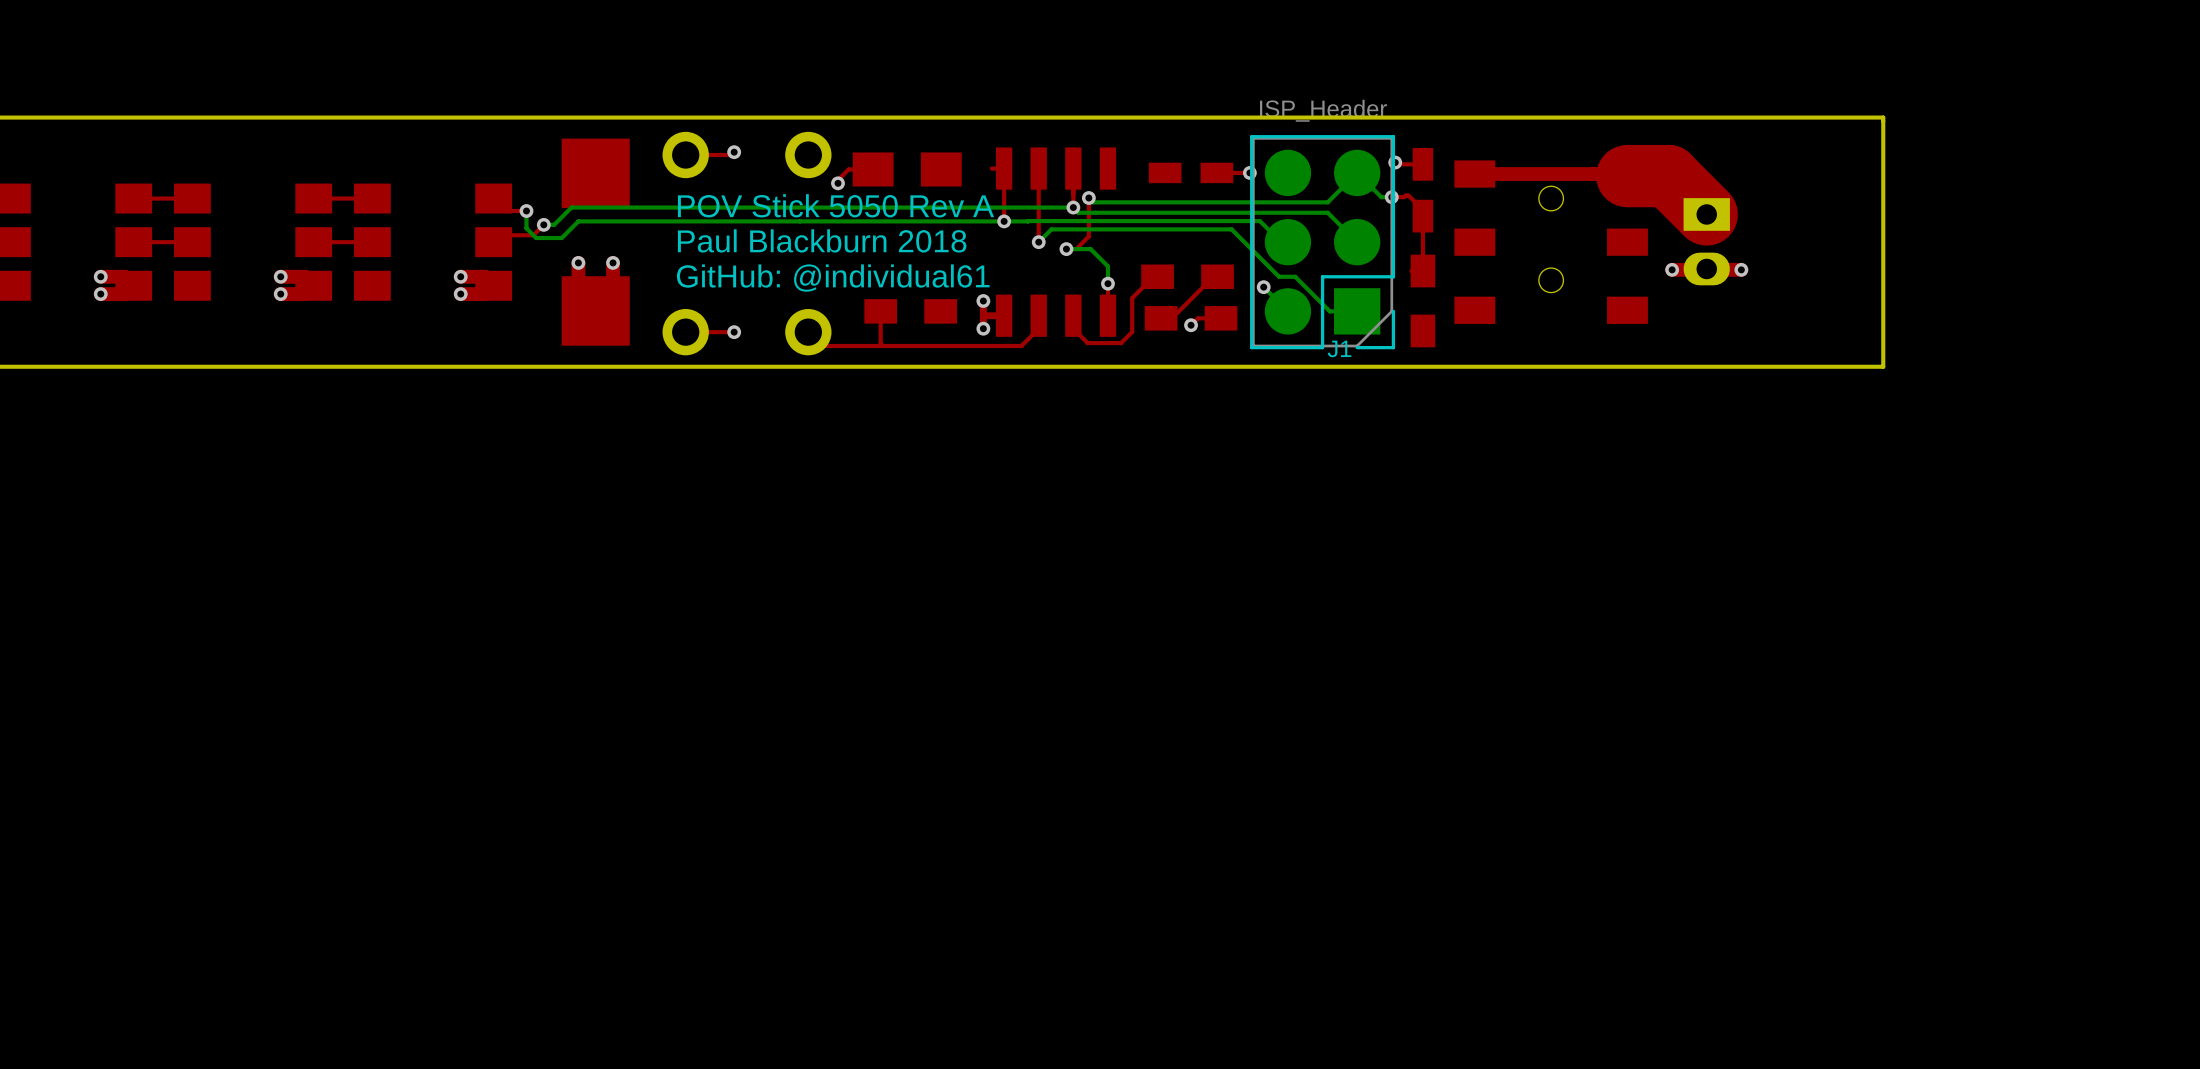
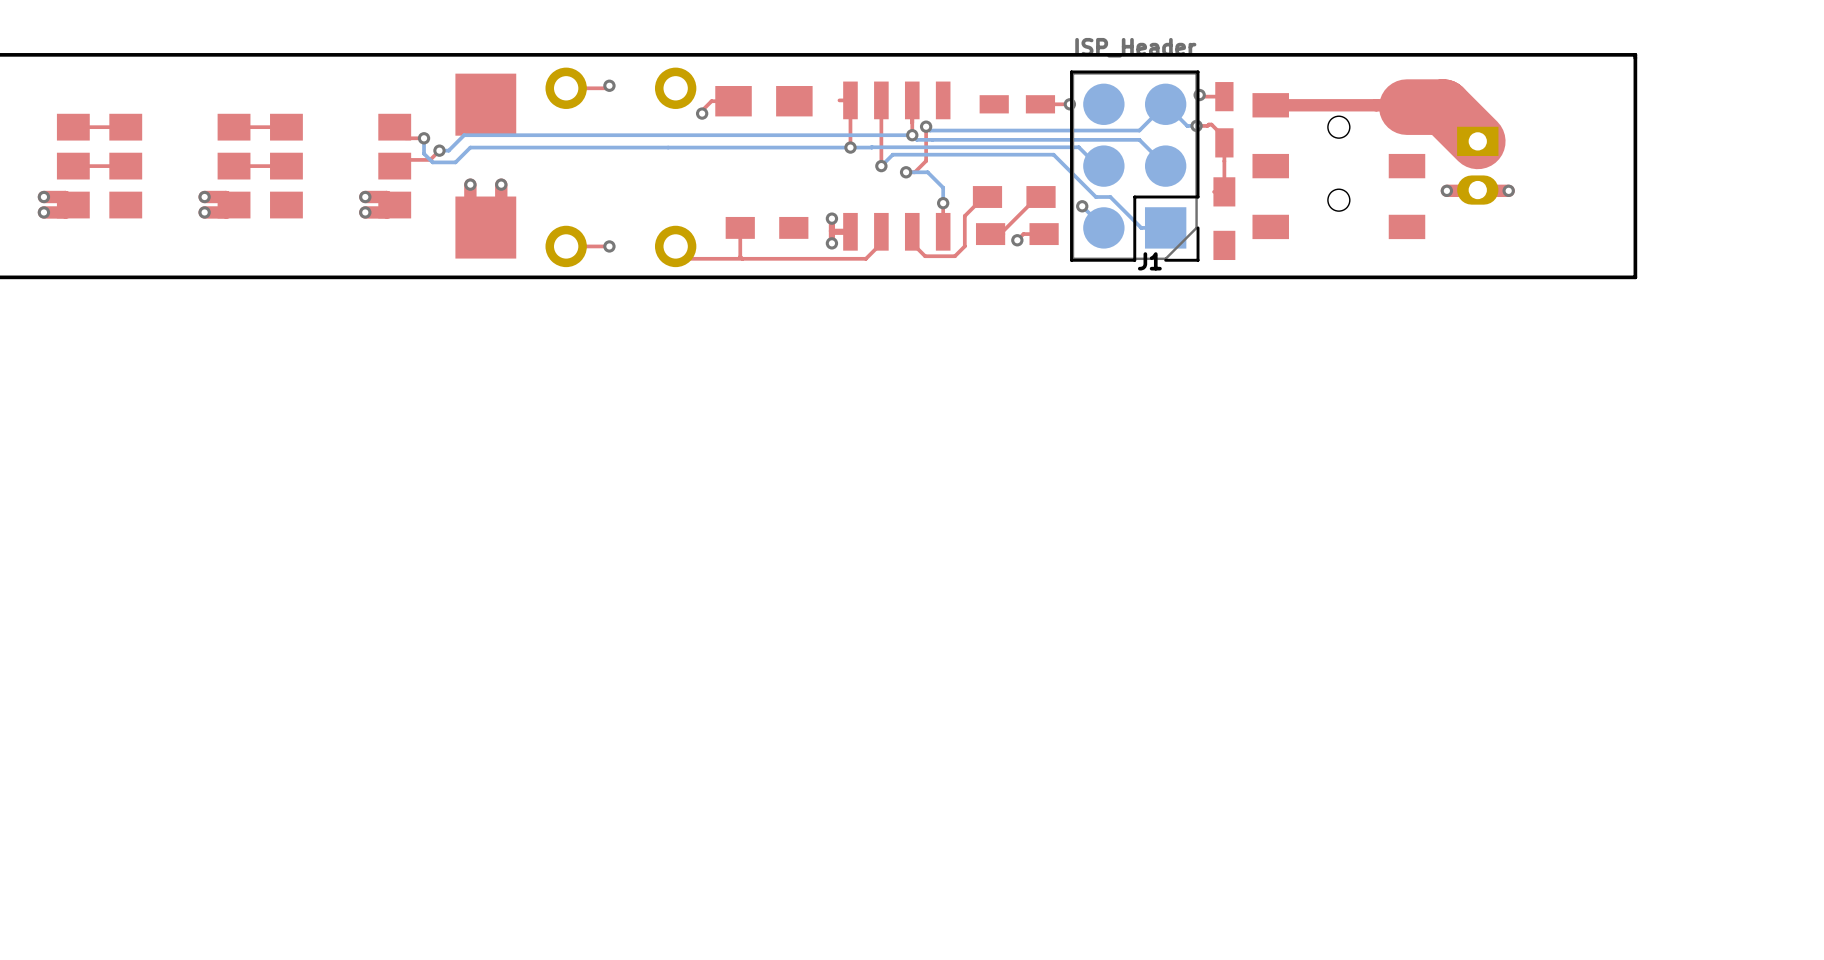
text: POV Stick 5050 Rev A (836, 205) -> none
text: Paul Blackburn 2018 (822, 240) -> none
text: GitHub: @individual61 (833, 278) -> none

